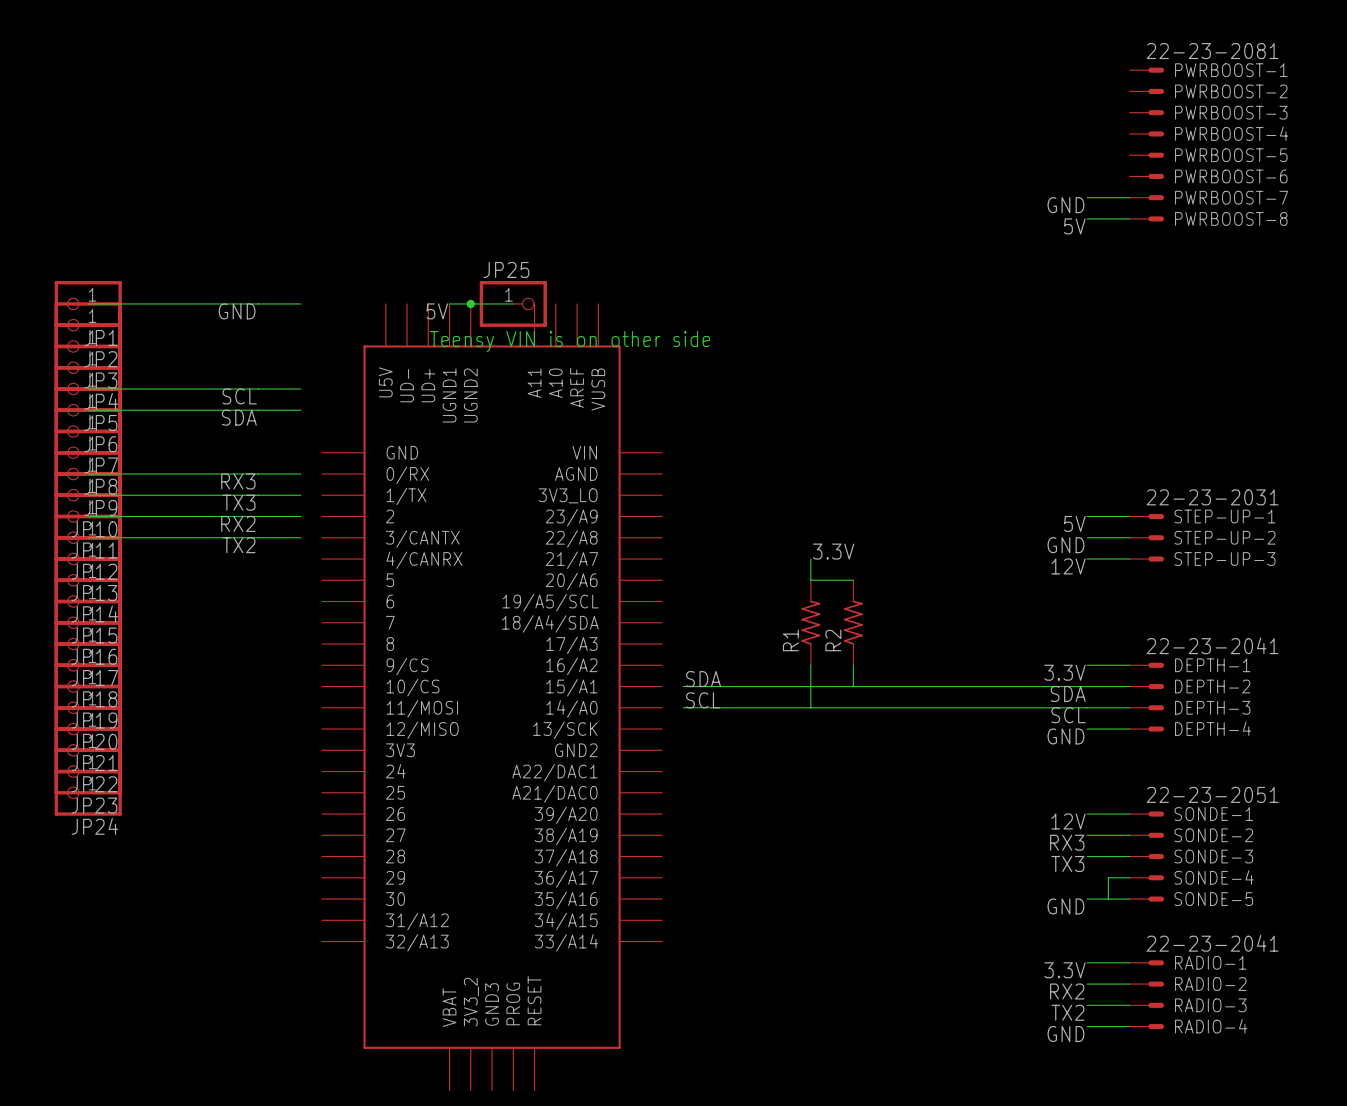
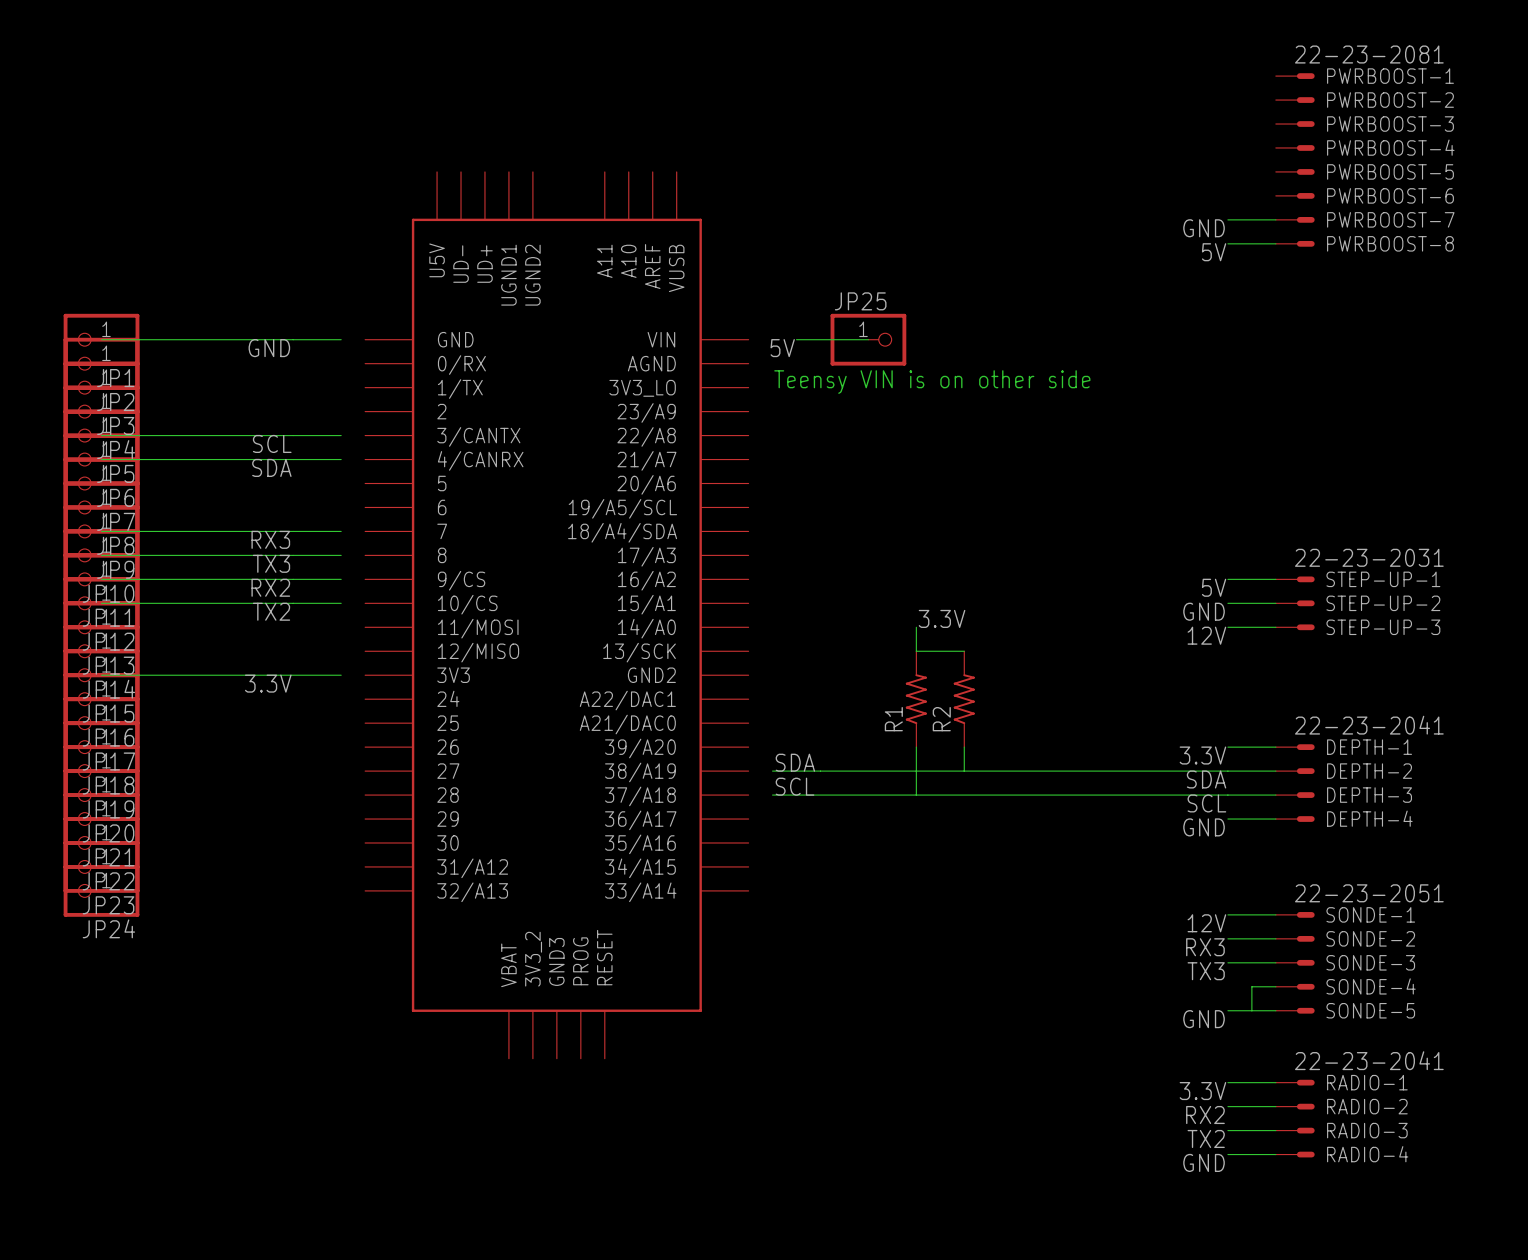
wire: (449, 303) (513, 303) -> none
junction: (470, 303) -> none
JP25 position: (513, 303) -> (868, 339)
wire: none -> (796, 339) (868, 339)
label: 5V (437, 311) -> none
label: none -> 5V (782, 348)
text: Teensy VIN is on other side (569, 341) -> none
text: none -> Teensy VIN is on other side (932, 382)
wire: none -> (101, 675) (341, 675)
label: none -> 3.3V (268, 683)
part position: (492, 697) -> (556, 615)

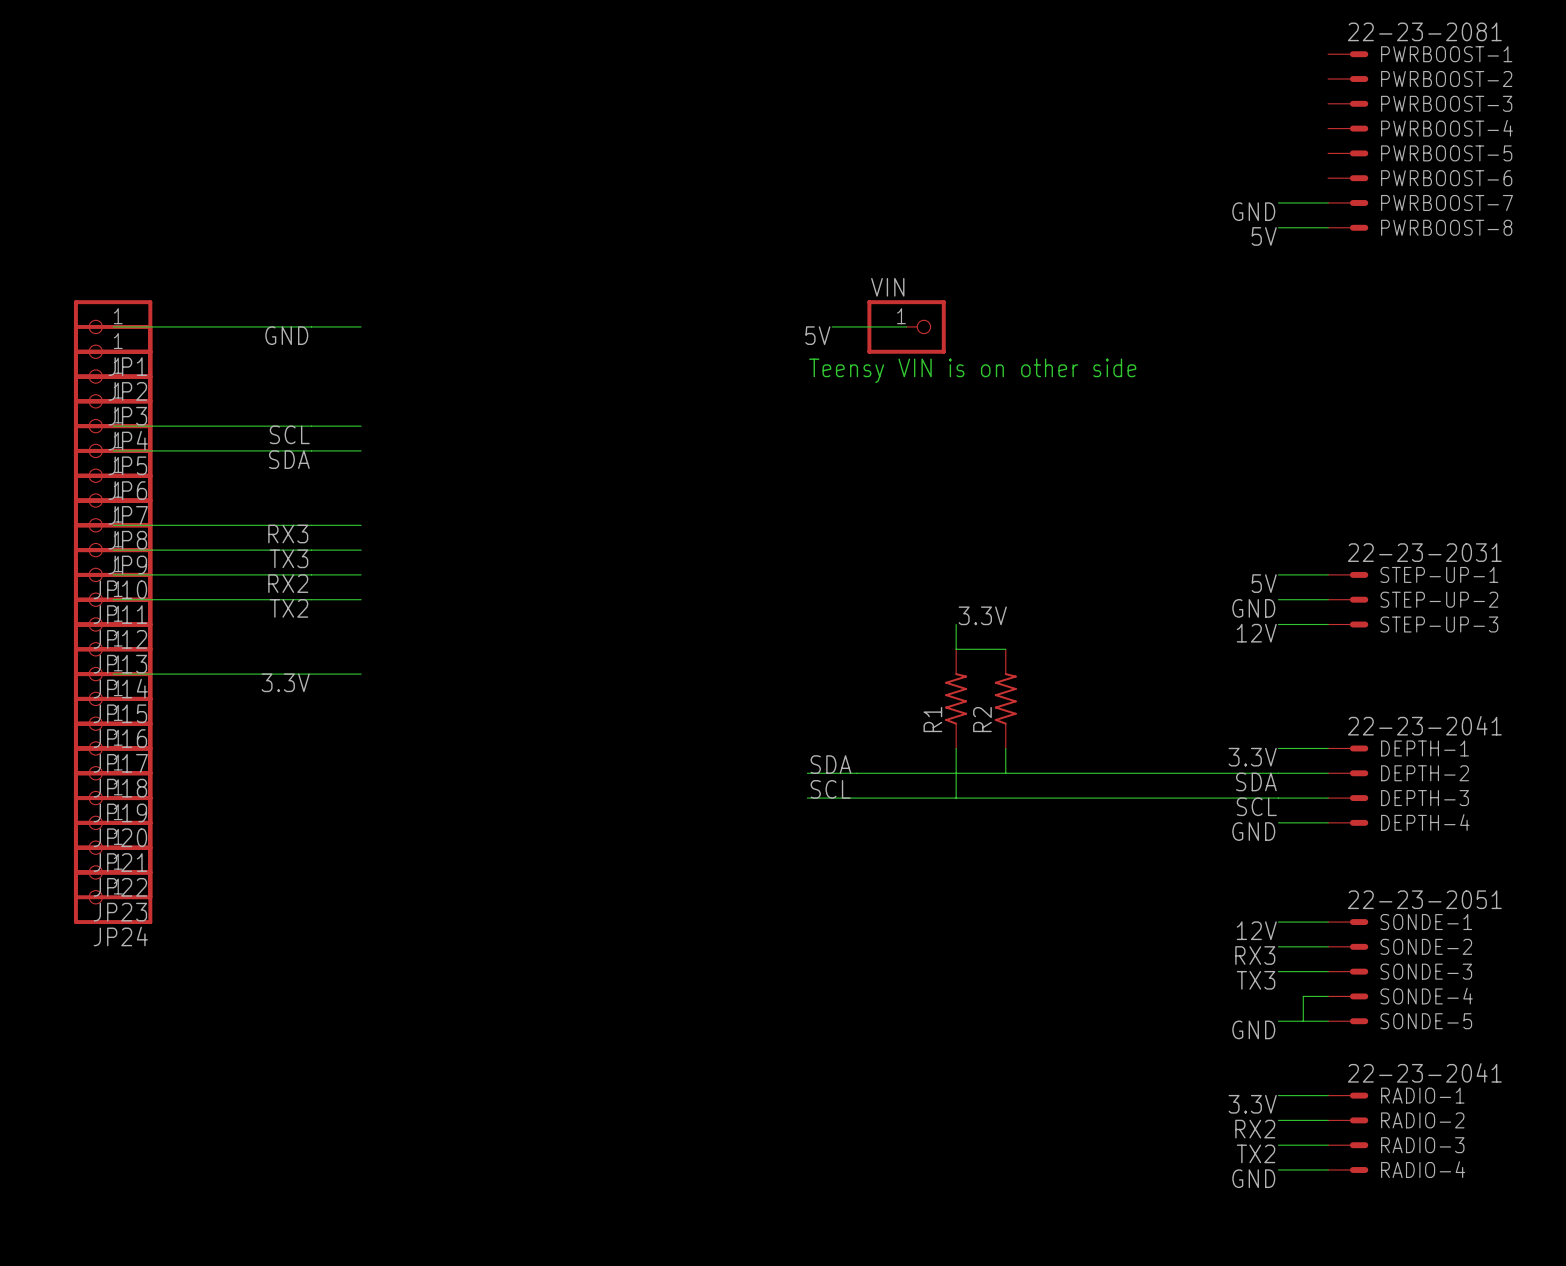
JP25 name: JP25 (860, 301) -> VIN (887, 287)
part: (556, 615) -> none

